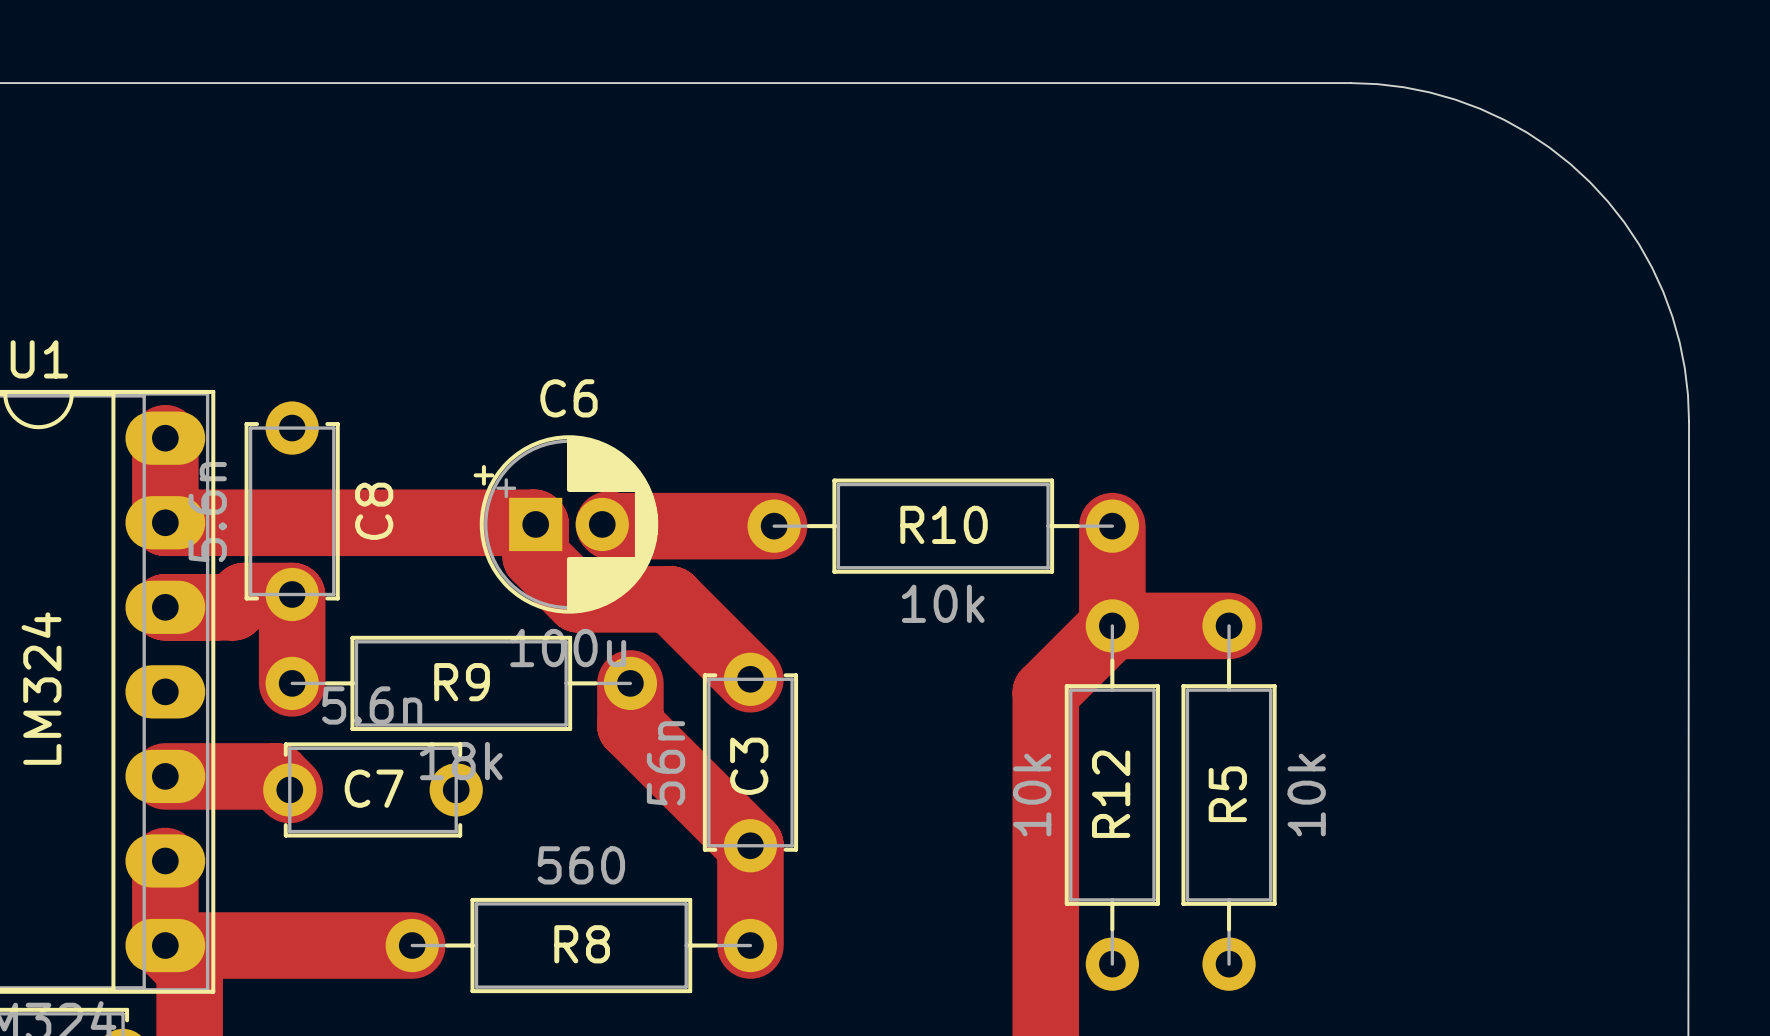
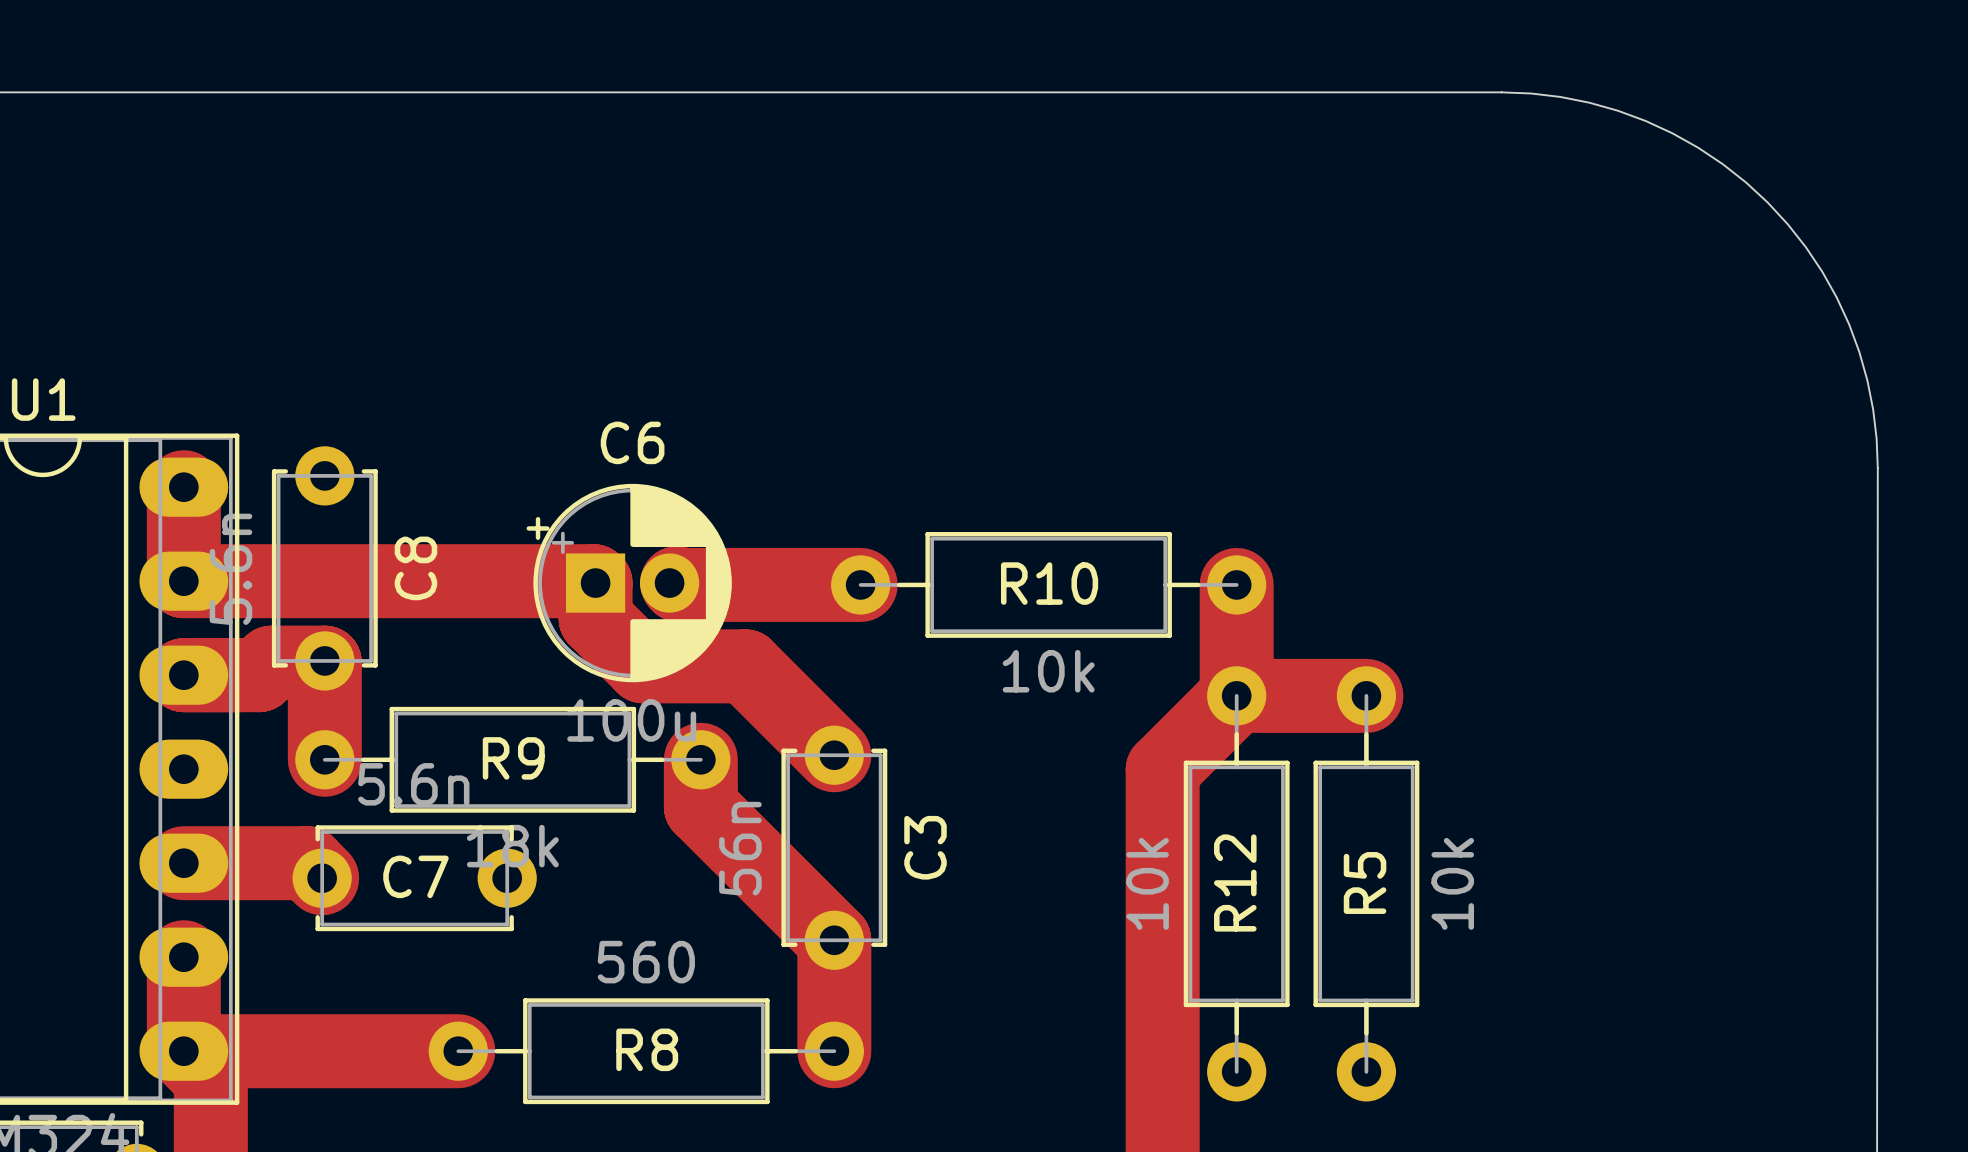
text: LM324 (41, 688) -> none
C3 name position: C3 (749, 766) -> C3 (925, 847)

